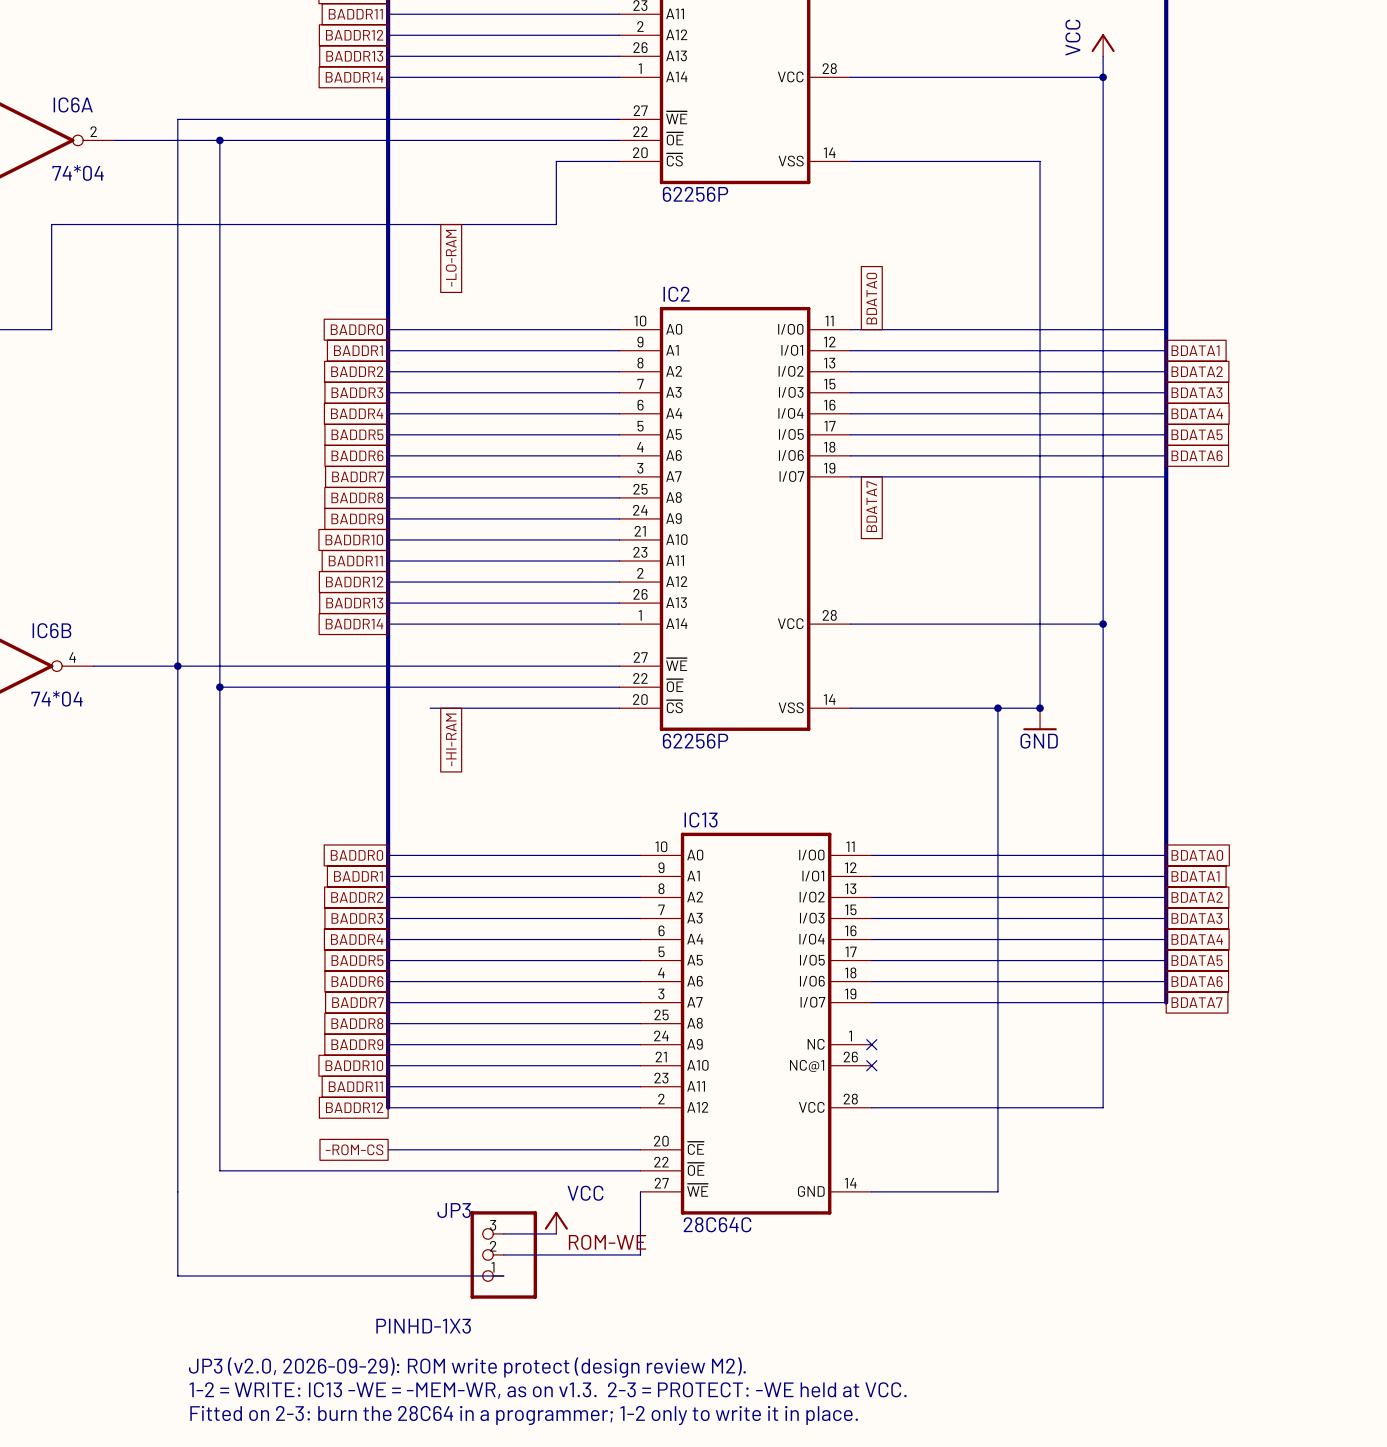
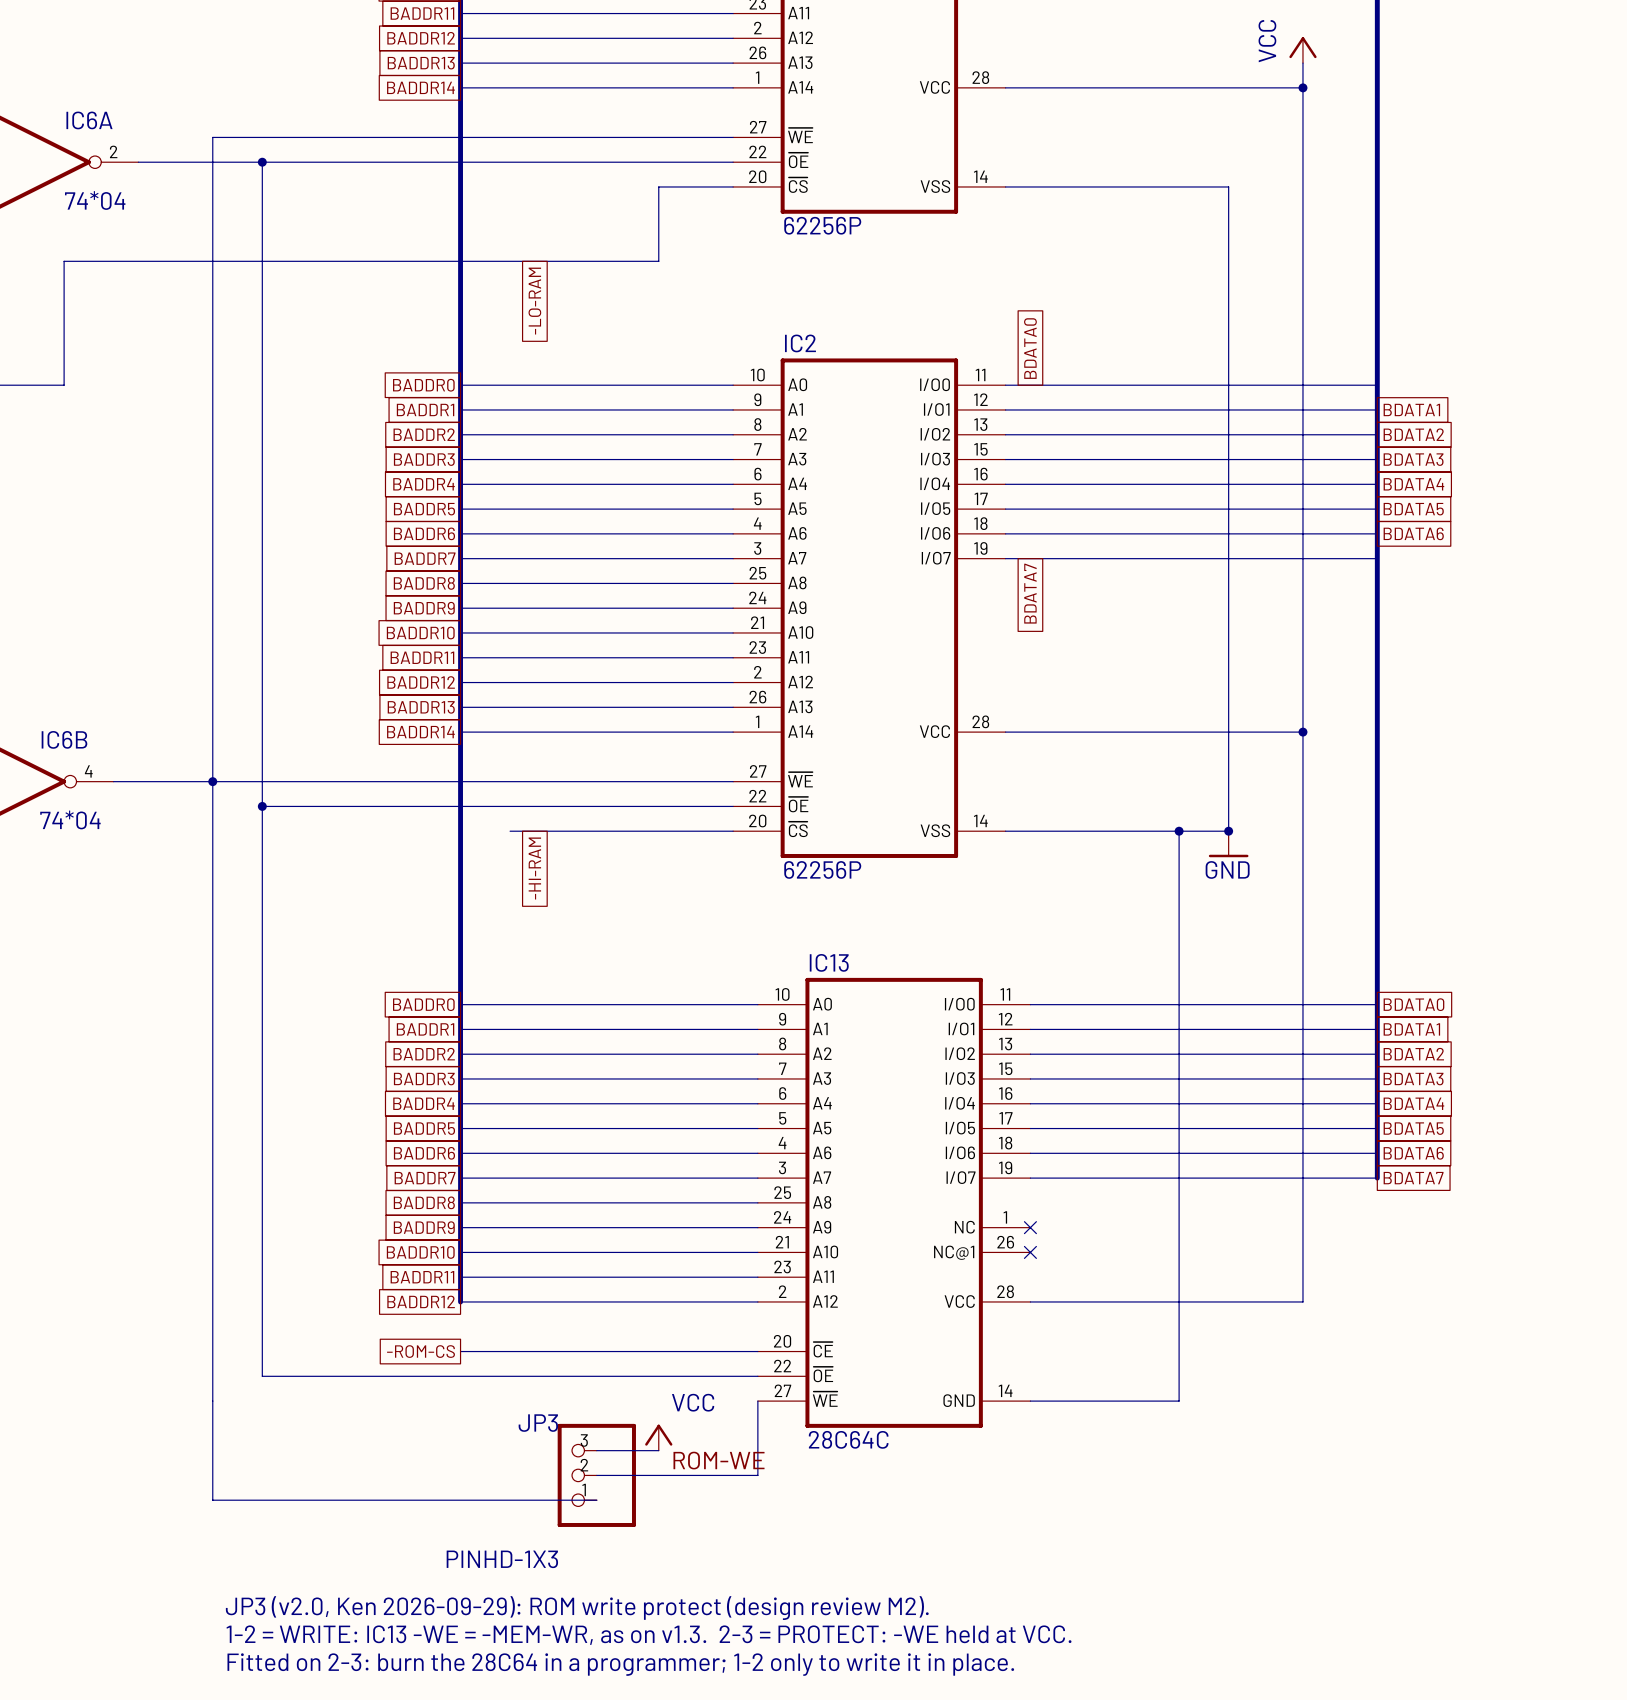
text: JP3 (v2.0, 2026-09-29): ROM write protect (design review M2). (467, 1367) -> JP3 (v2.0, Ken 2026-09-29): ROM write protect (design review M2). (577, 1608)

